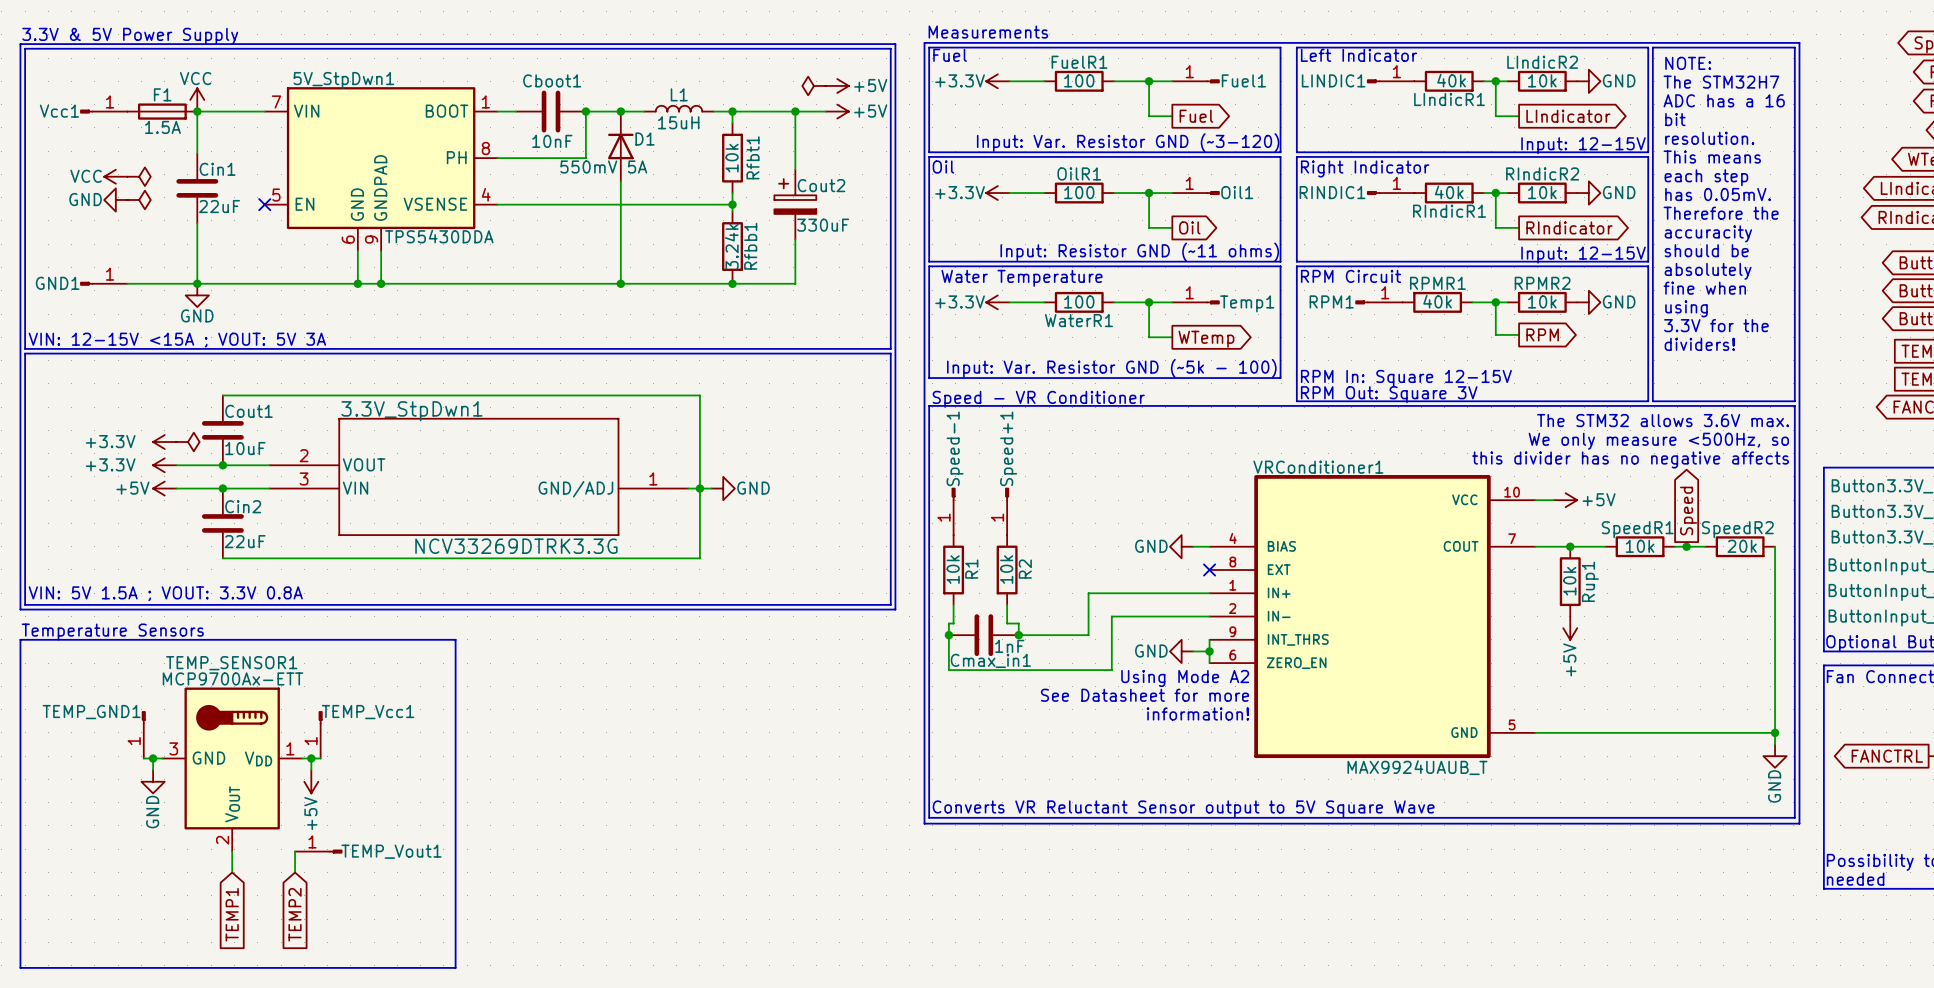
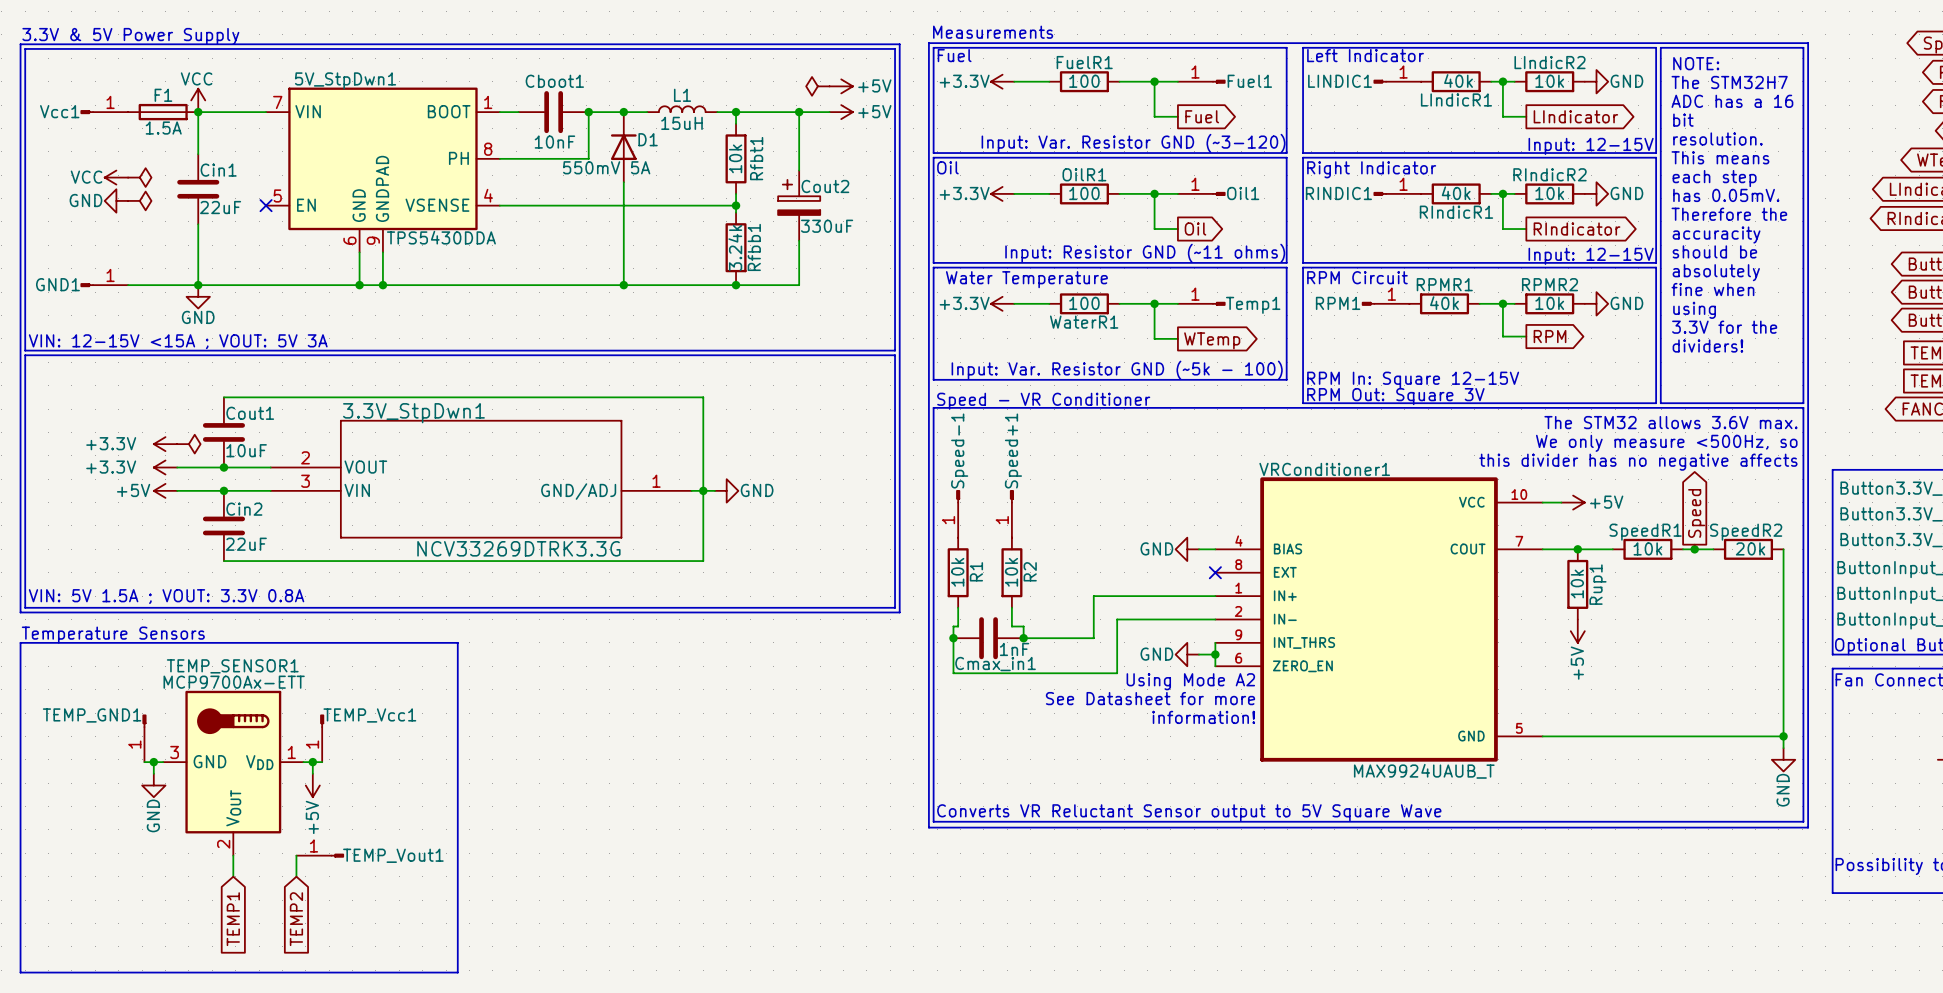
global label: FANCTRL (1887, 756) -> none
text: needed (1855, 879) -> none

